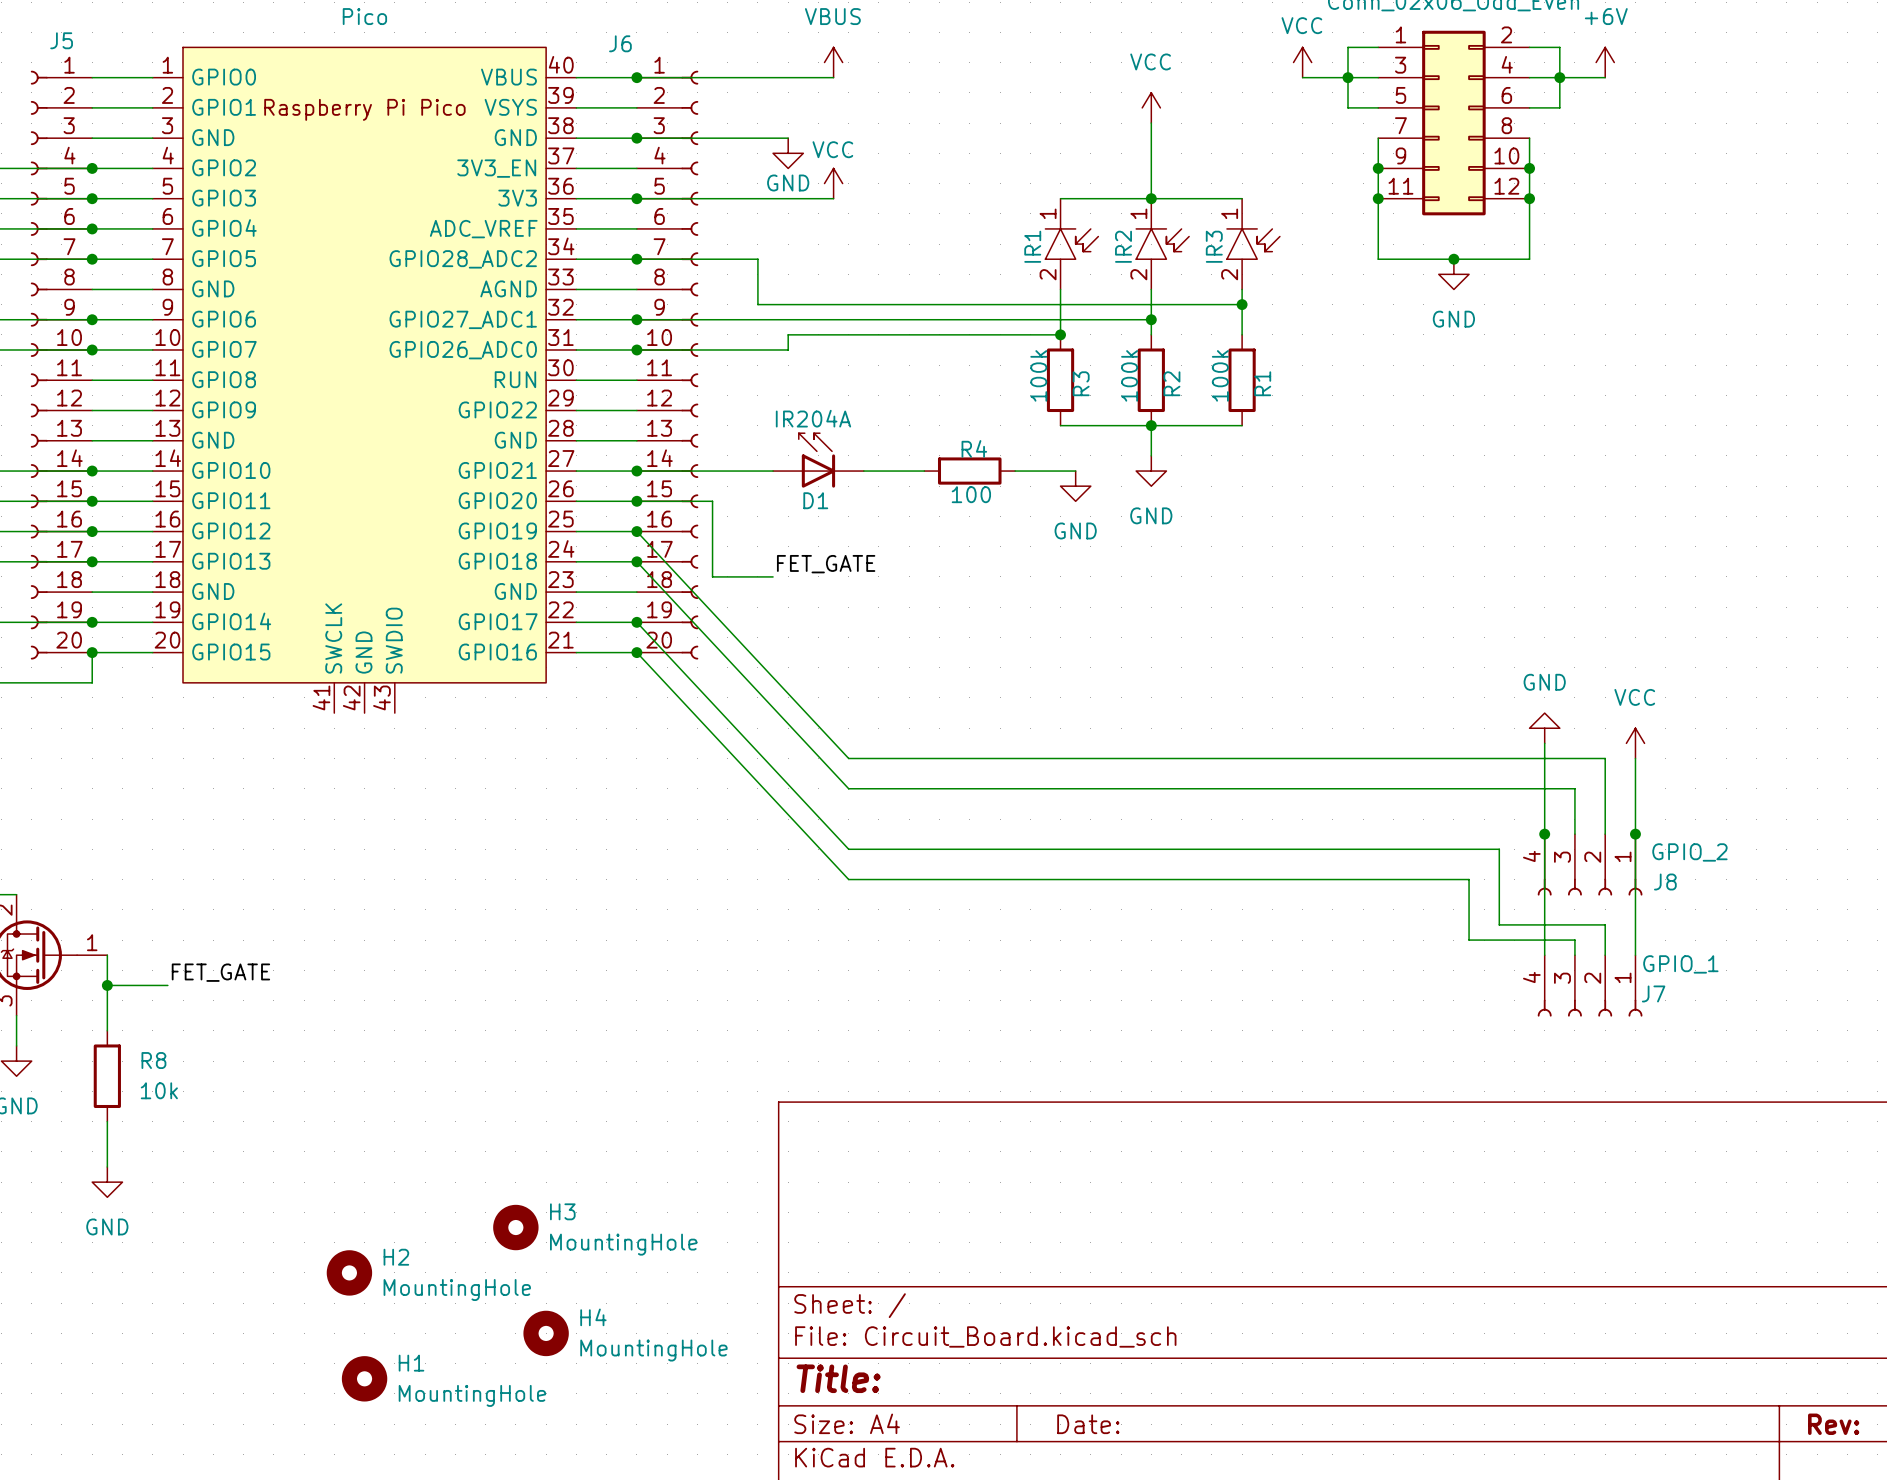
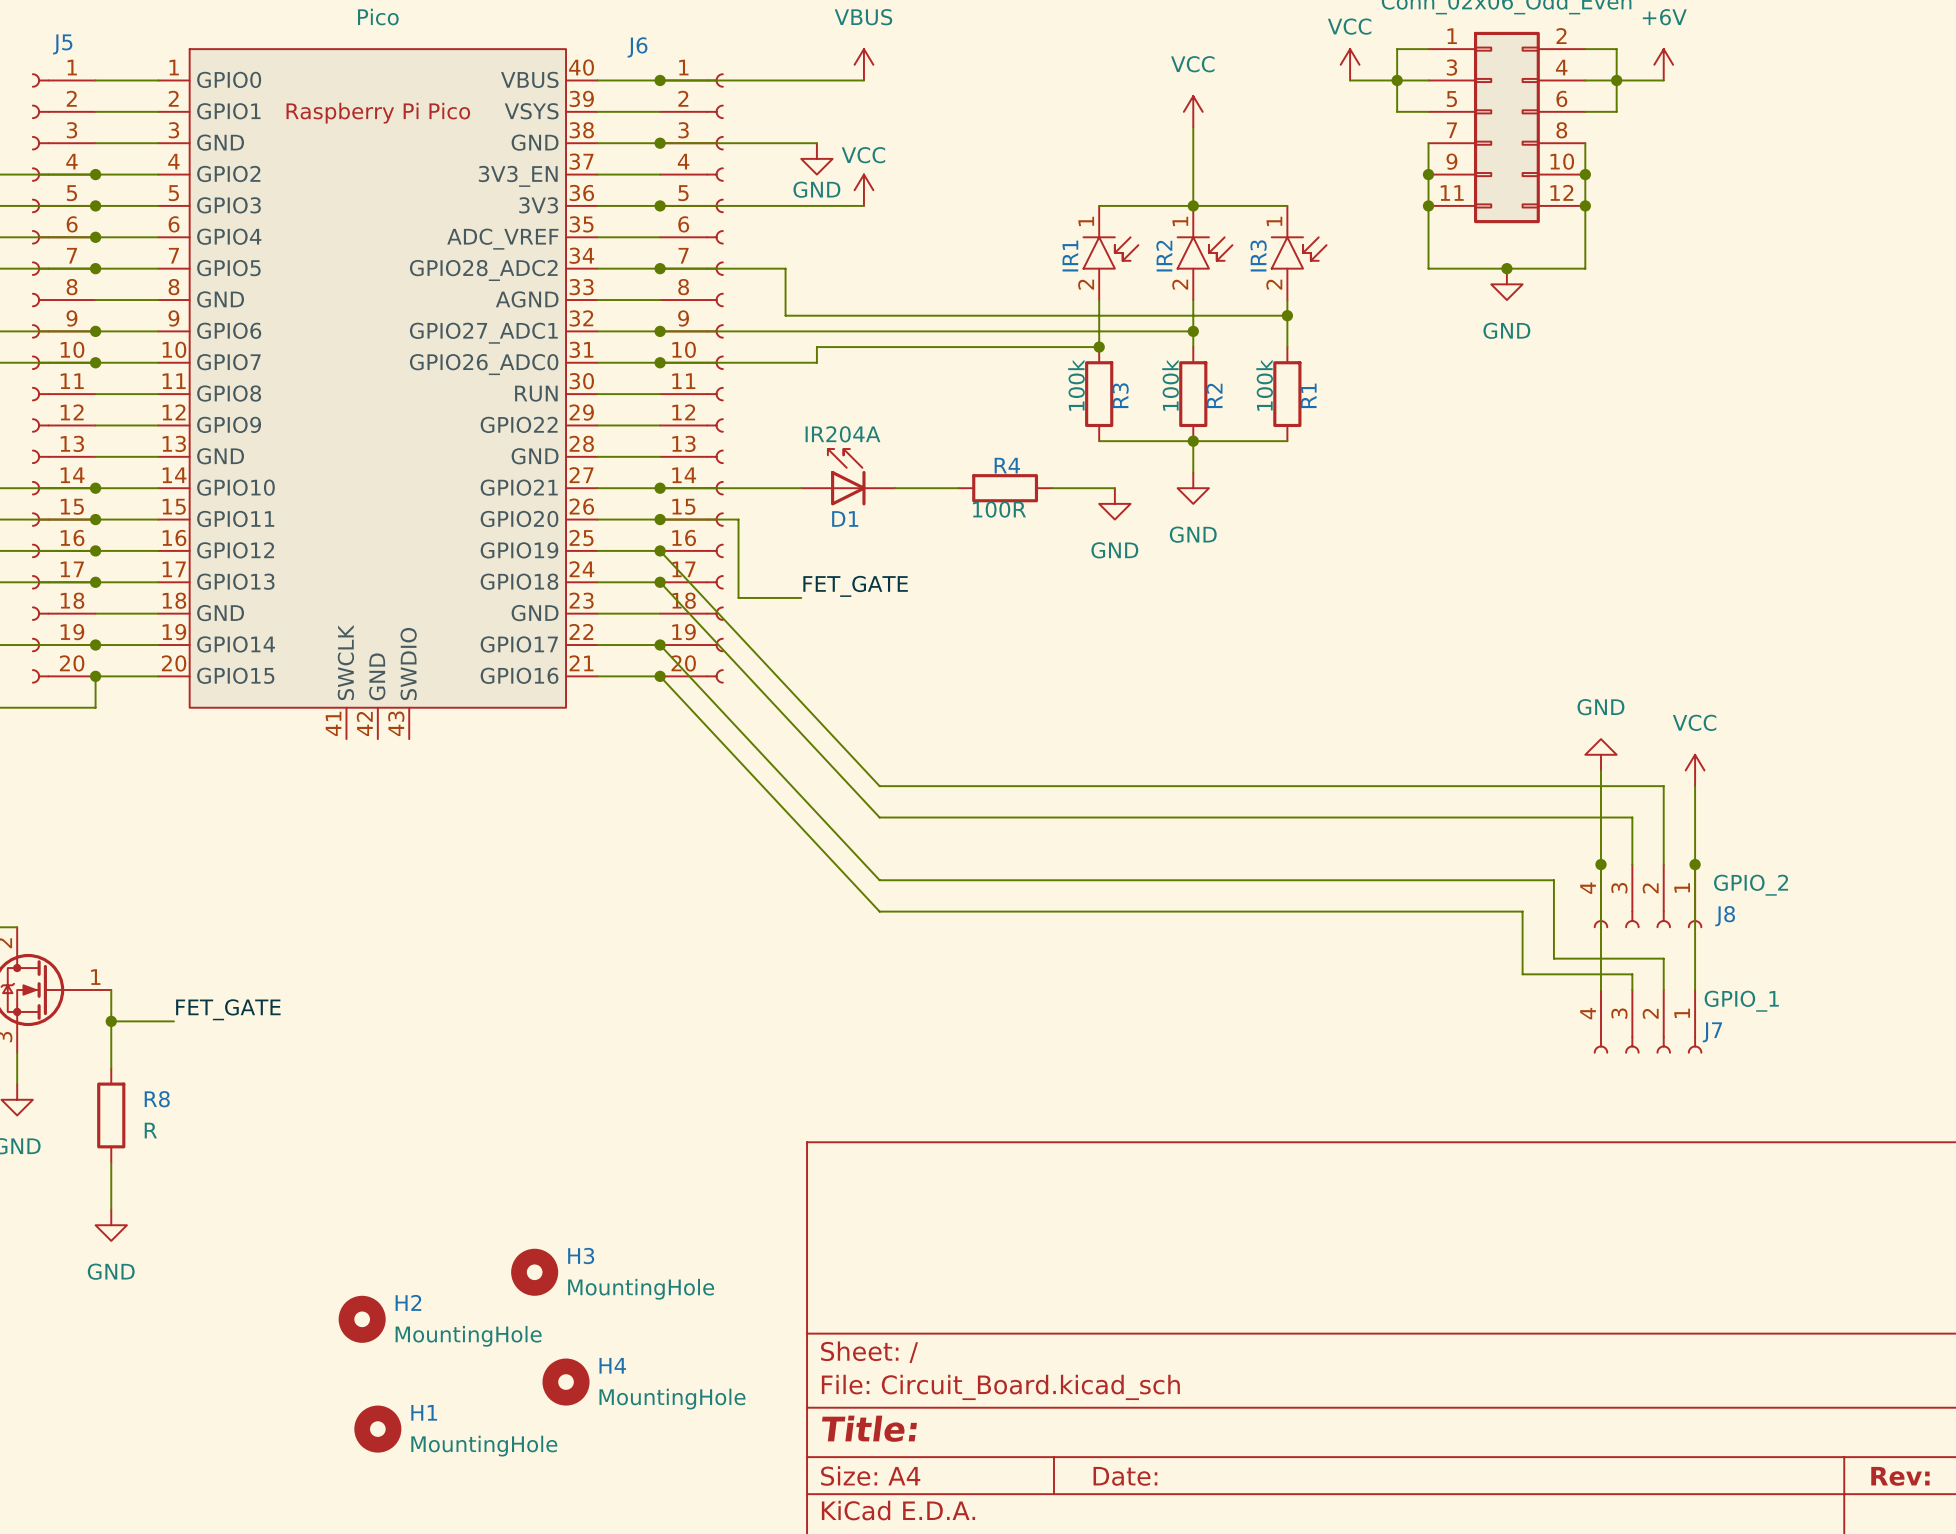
R4 value: 100 (971, 494) -> 100R (999, 509)
R8 value: 10k (159, 1090) -> R (150, 1130)

